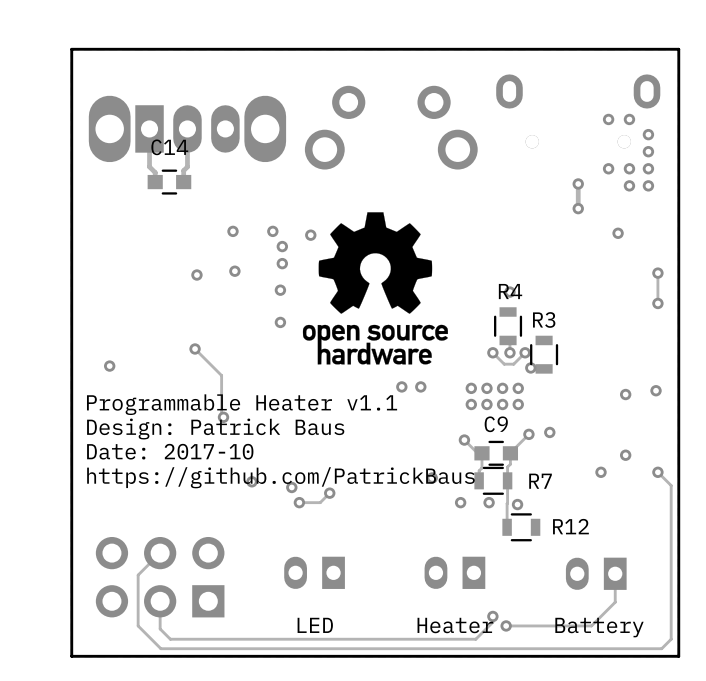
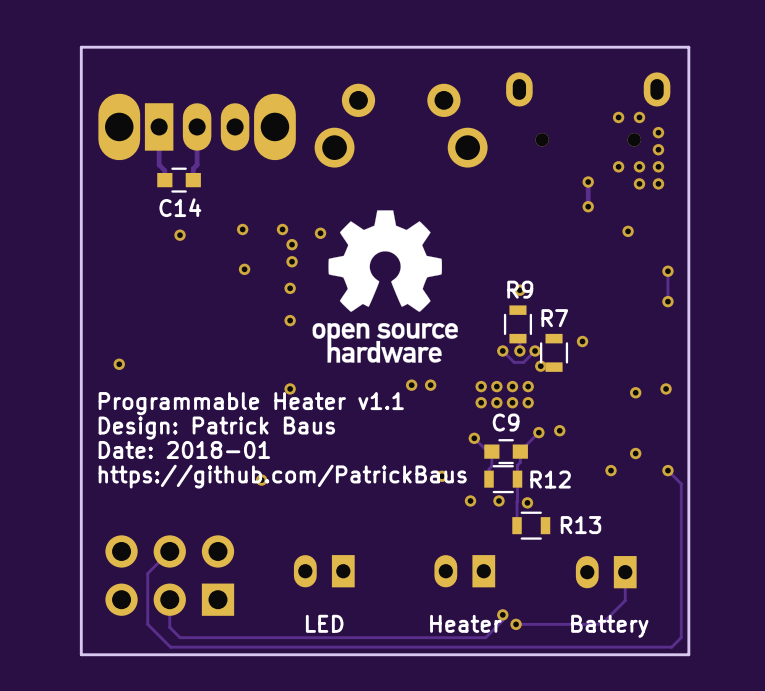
C14 name position: C14 (169, 147) -> C14 (180, 207)
via position: (196, 275) -> (180, 235)
R4 name: R4 (510, 291) -> R9 (520, 289)
R3 name: R3 (544, 319) -> R7 (554, 318)
via: none -> (582, 341)
track: (195, 348) (221, 375) (221, 415) (223, 417) -> none
via: (195, 348) -> none
via: none -> (290, 388)
via: (223, 417) -> none
text: Date: 2017-10 (170, 451) -> Date: 2018-01 (184, 449)
R7 name: R7 (540, 481) -> R12 (550, 479)
via: (291, 487) -> none
track: (329, 493) (320, 502) (299, 502) -> none
via: (329, 493) -> none
via: (299, 502) -> none
R12 name: R12 (570, 526) -> R13 (580, 525)

